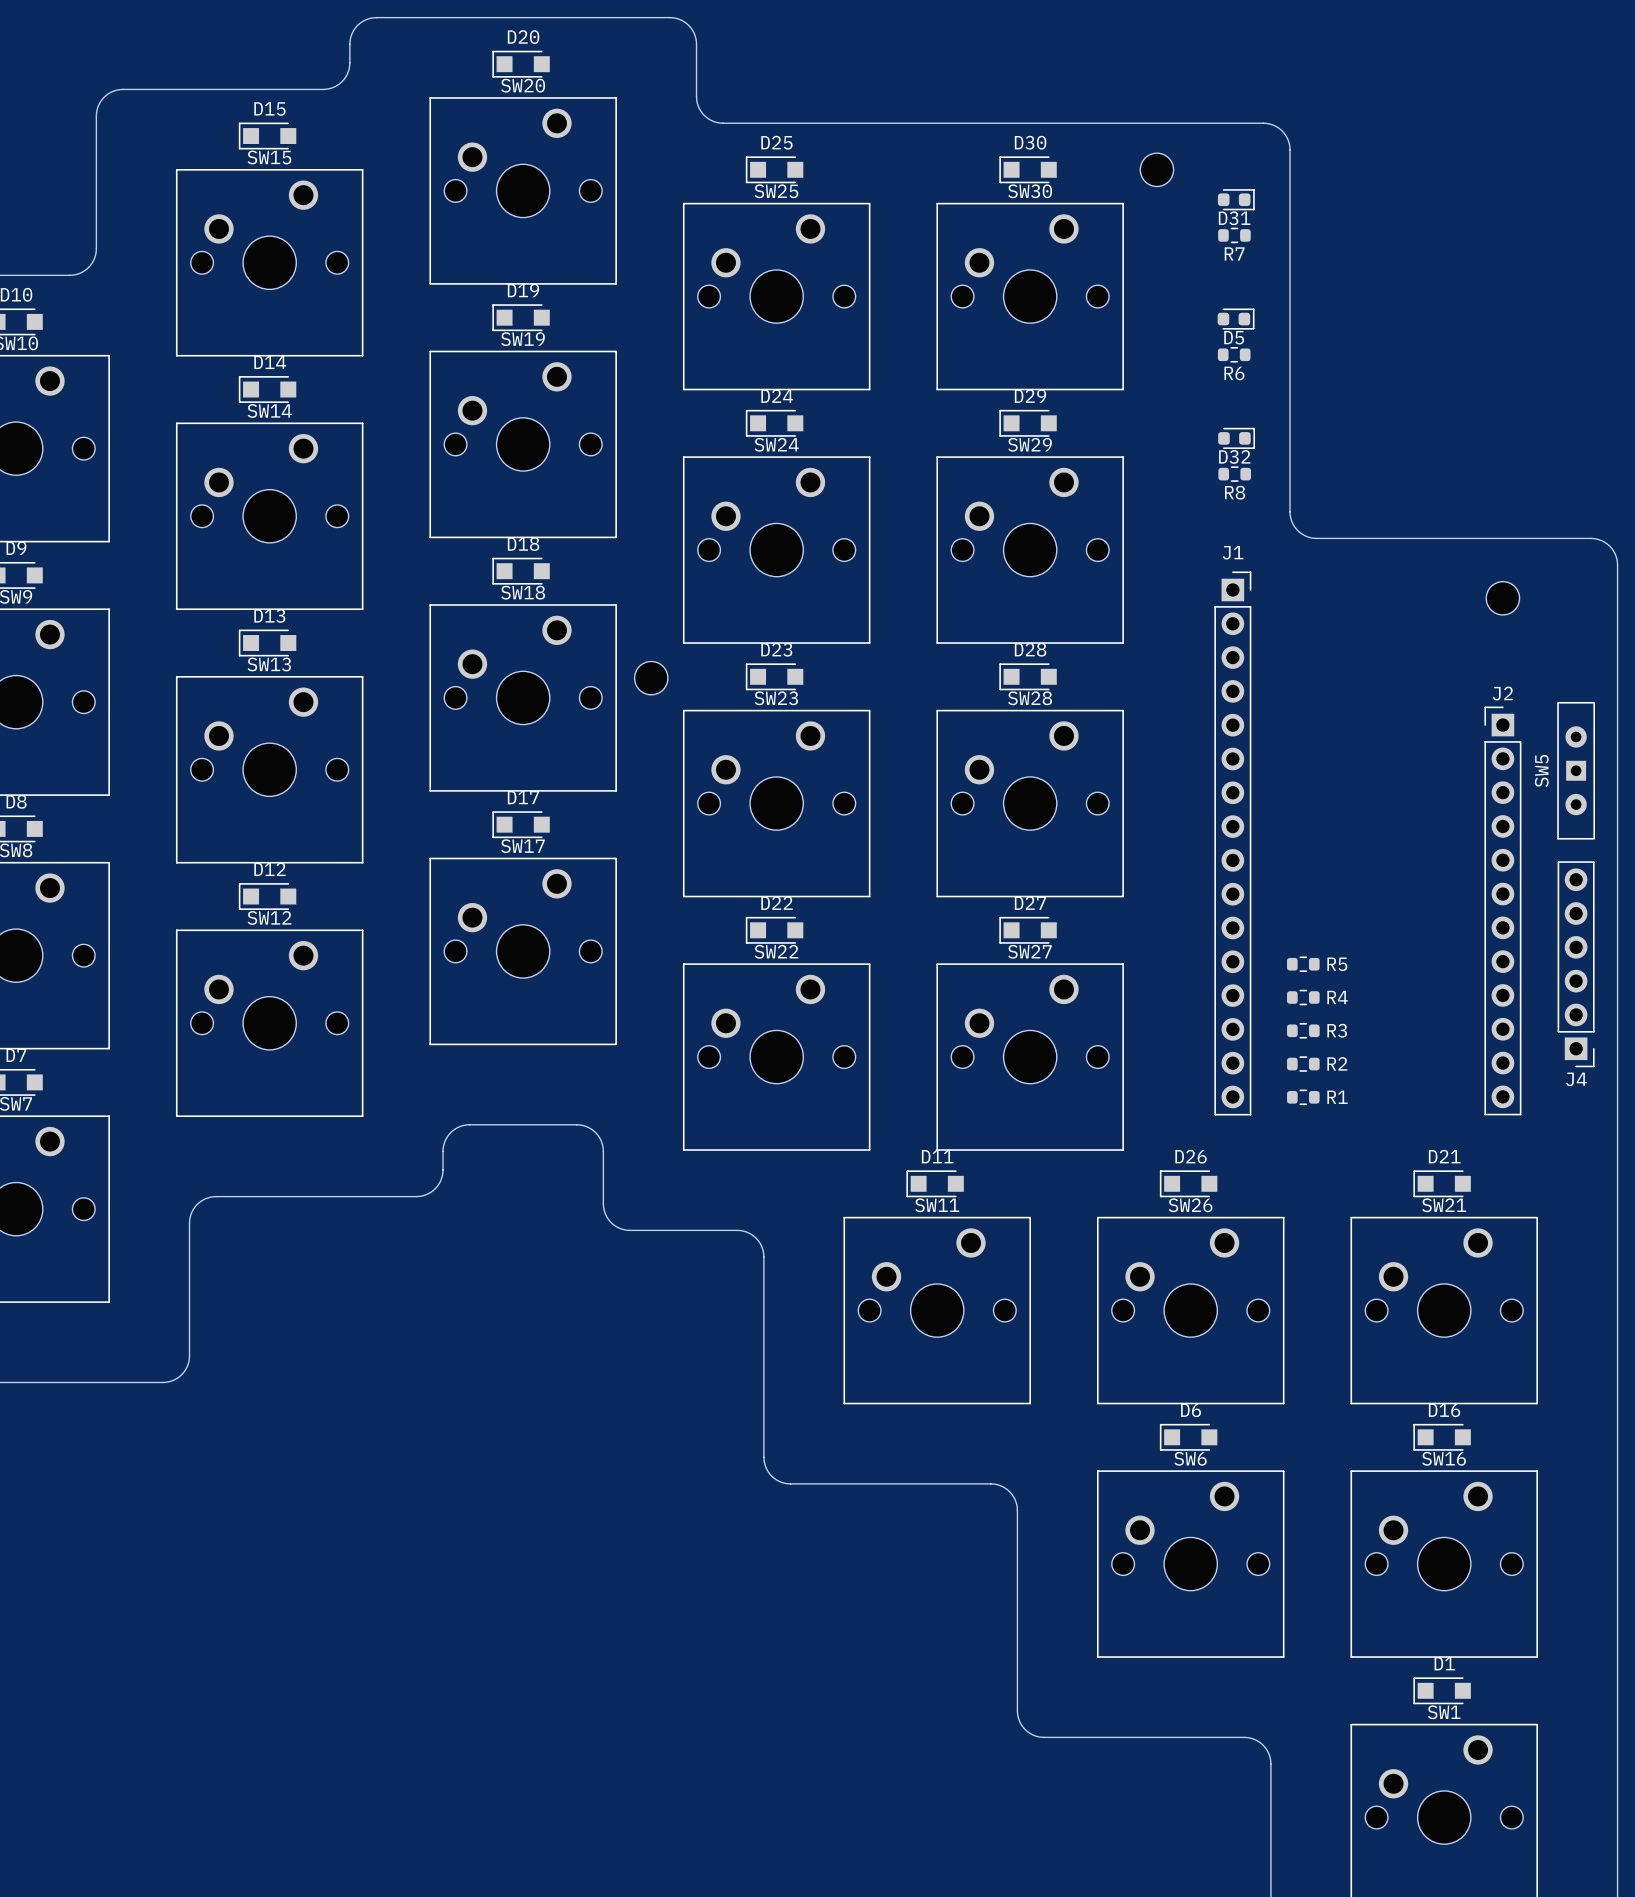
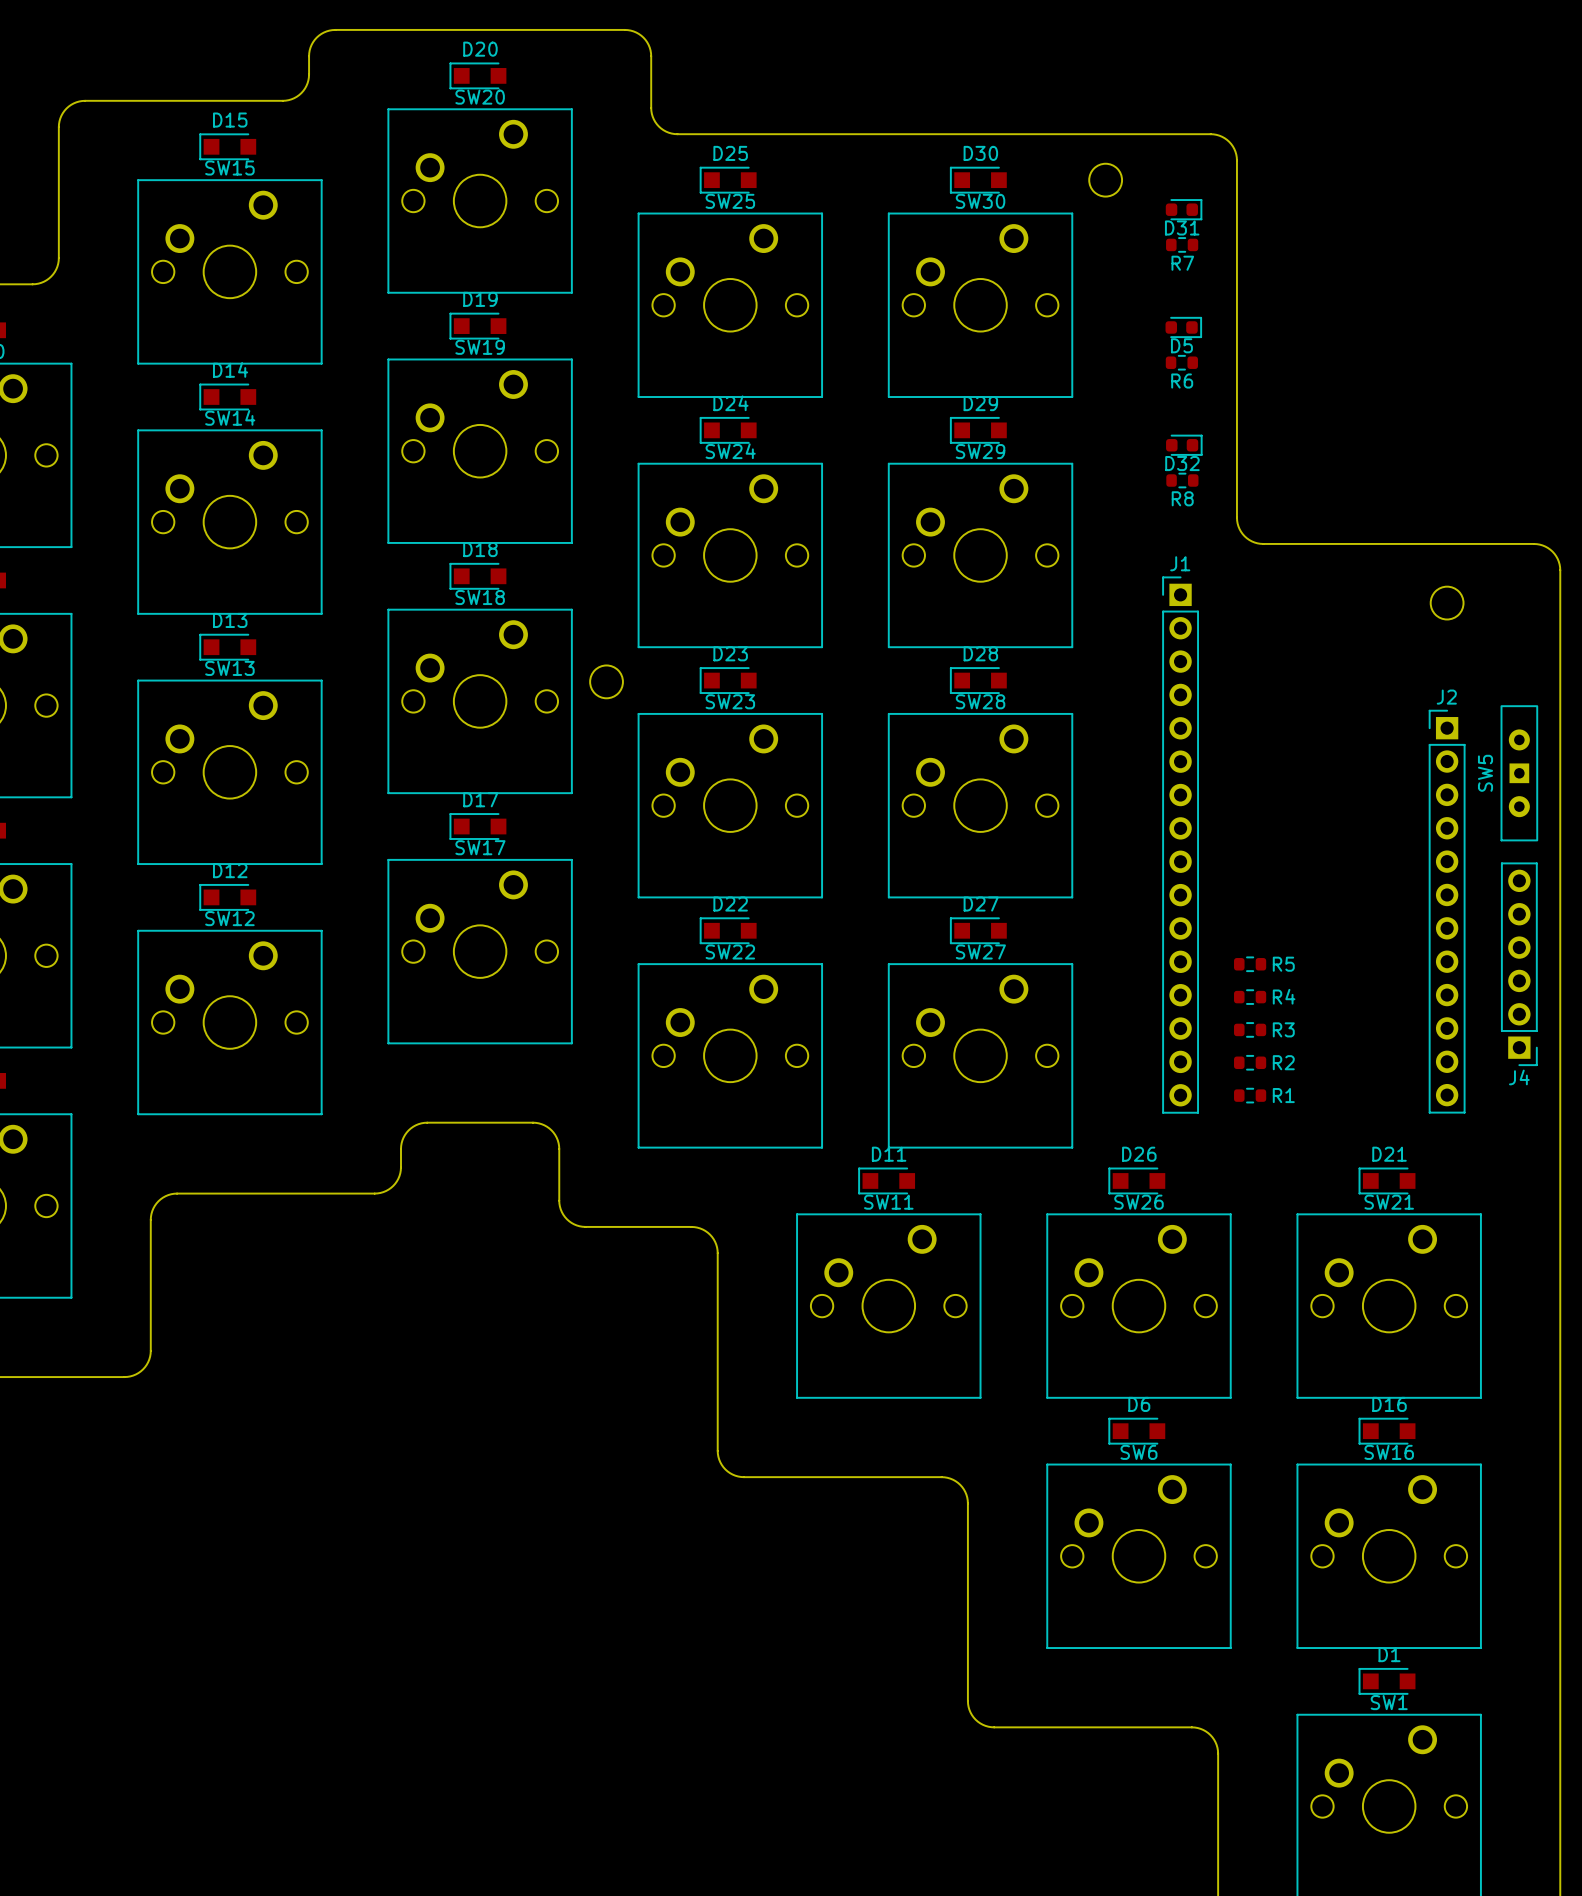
J1 footprint: [1214, 571, 1252, 1116] -> [1162, 576, 1199, 1114]

